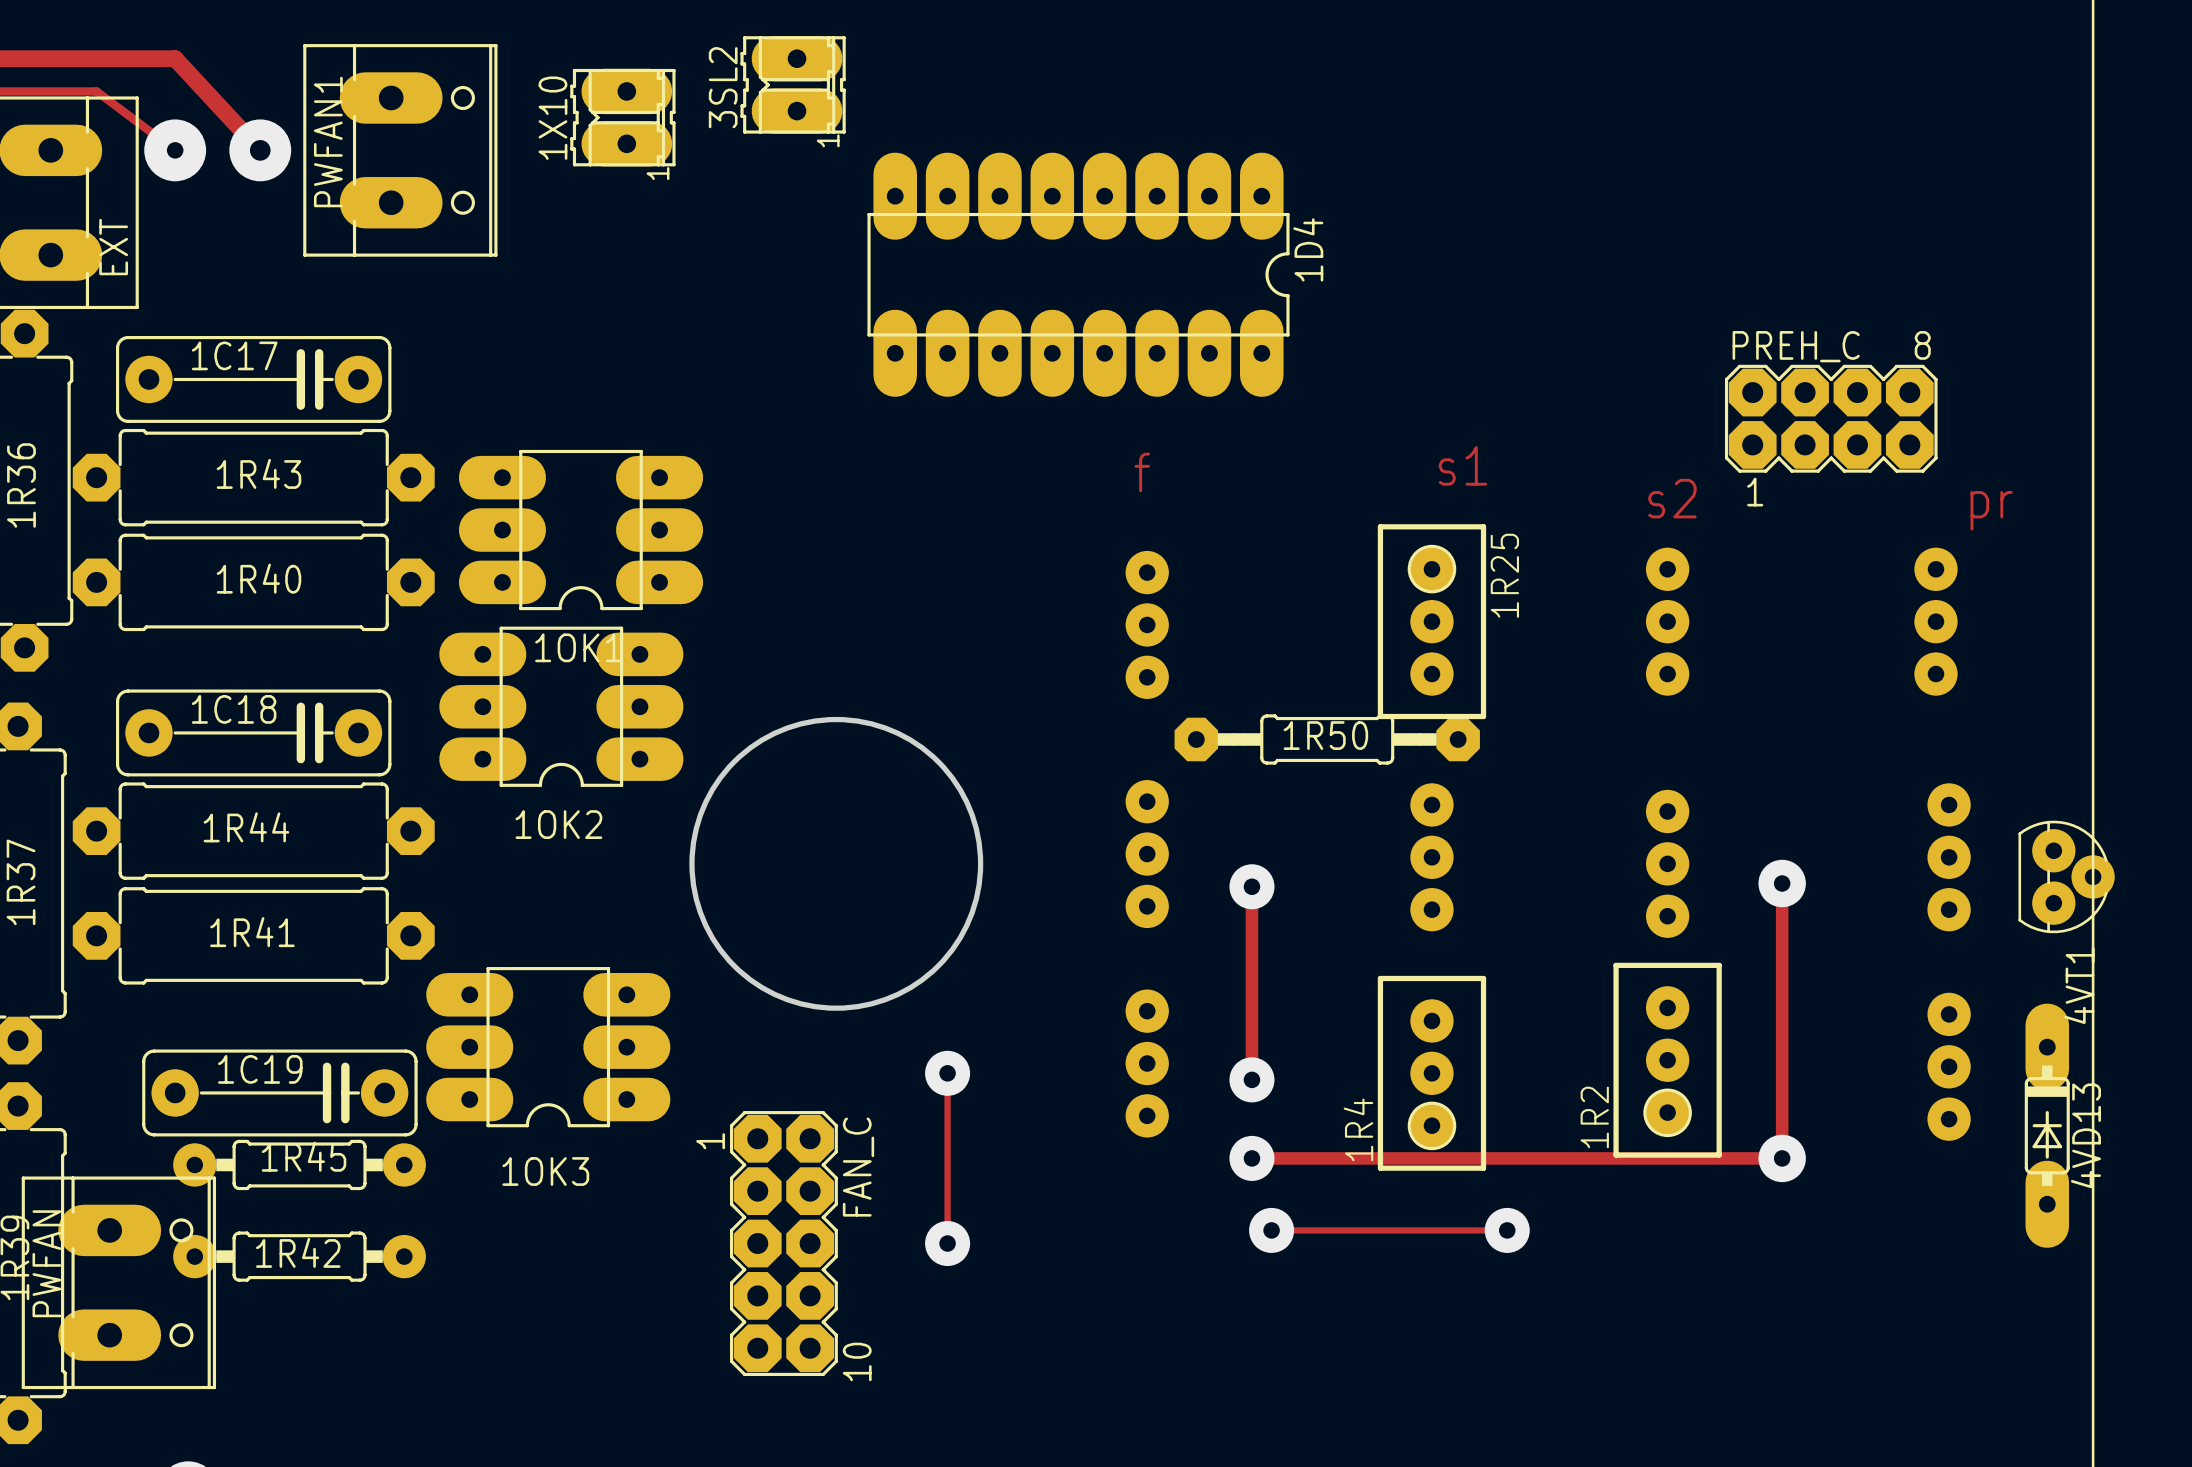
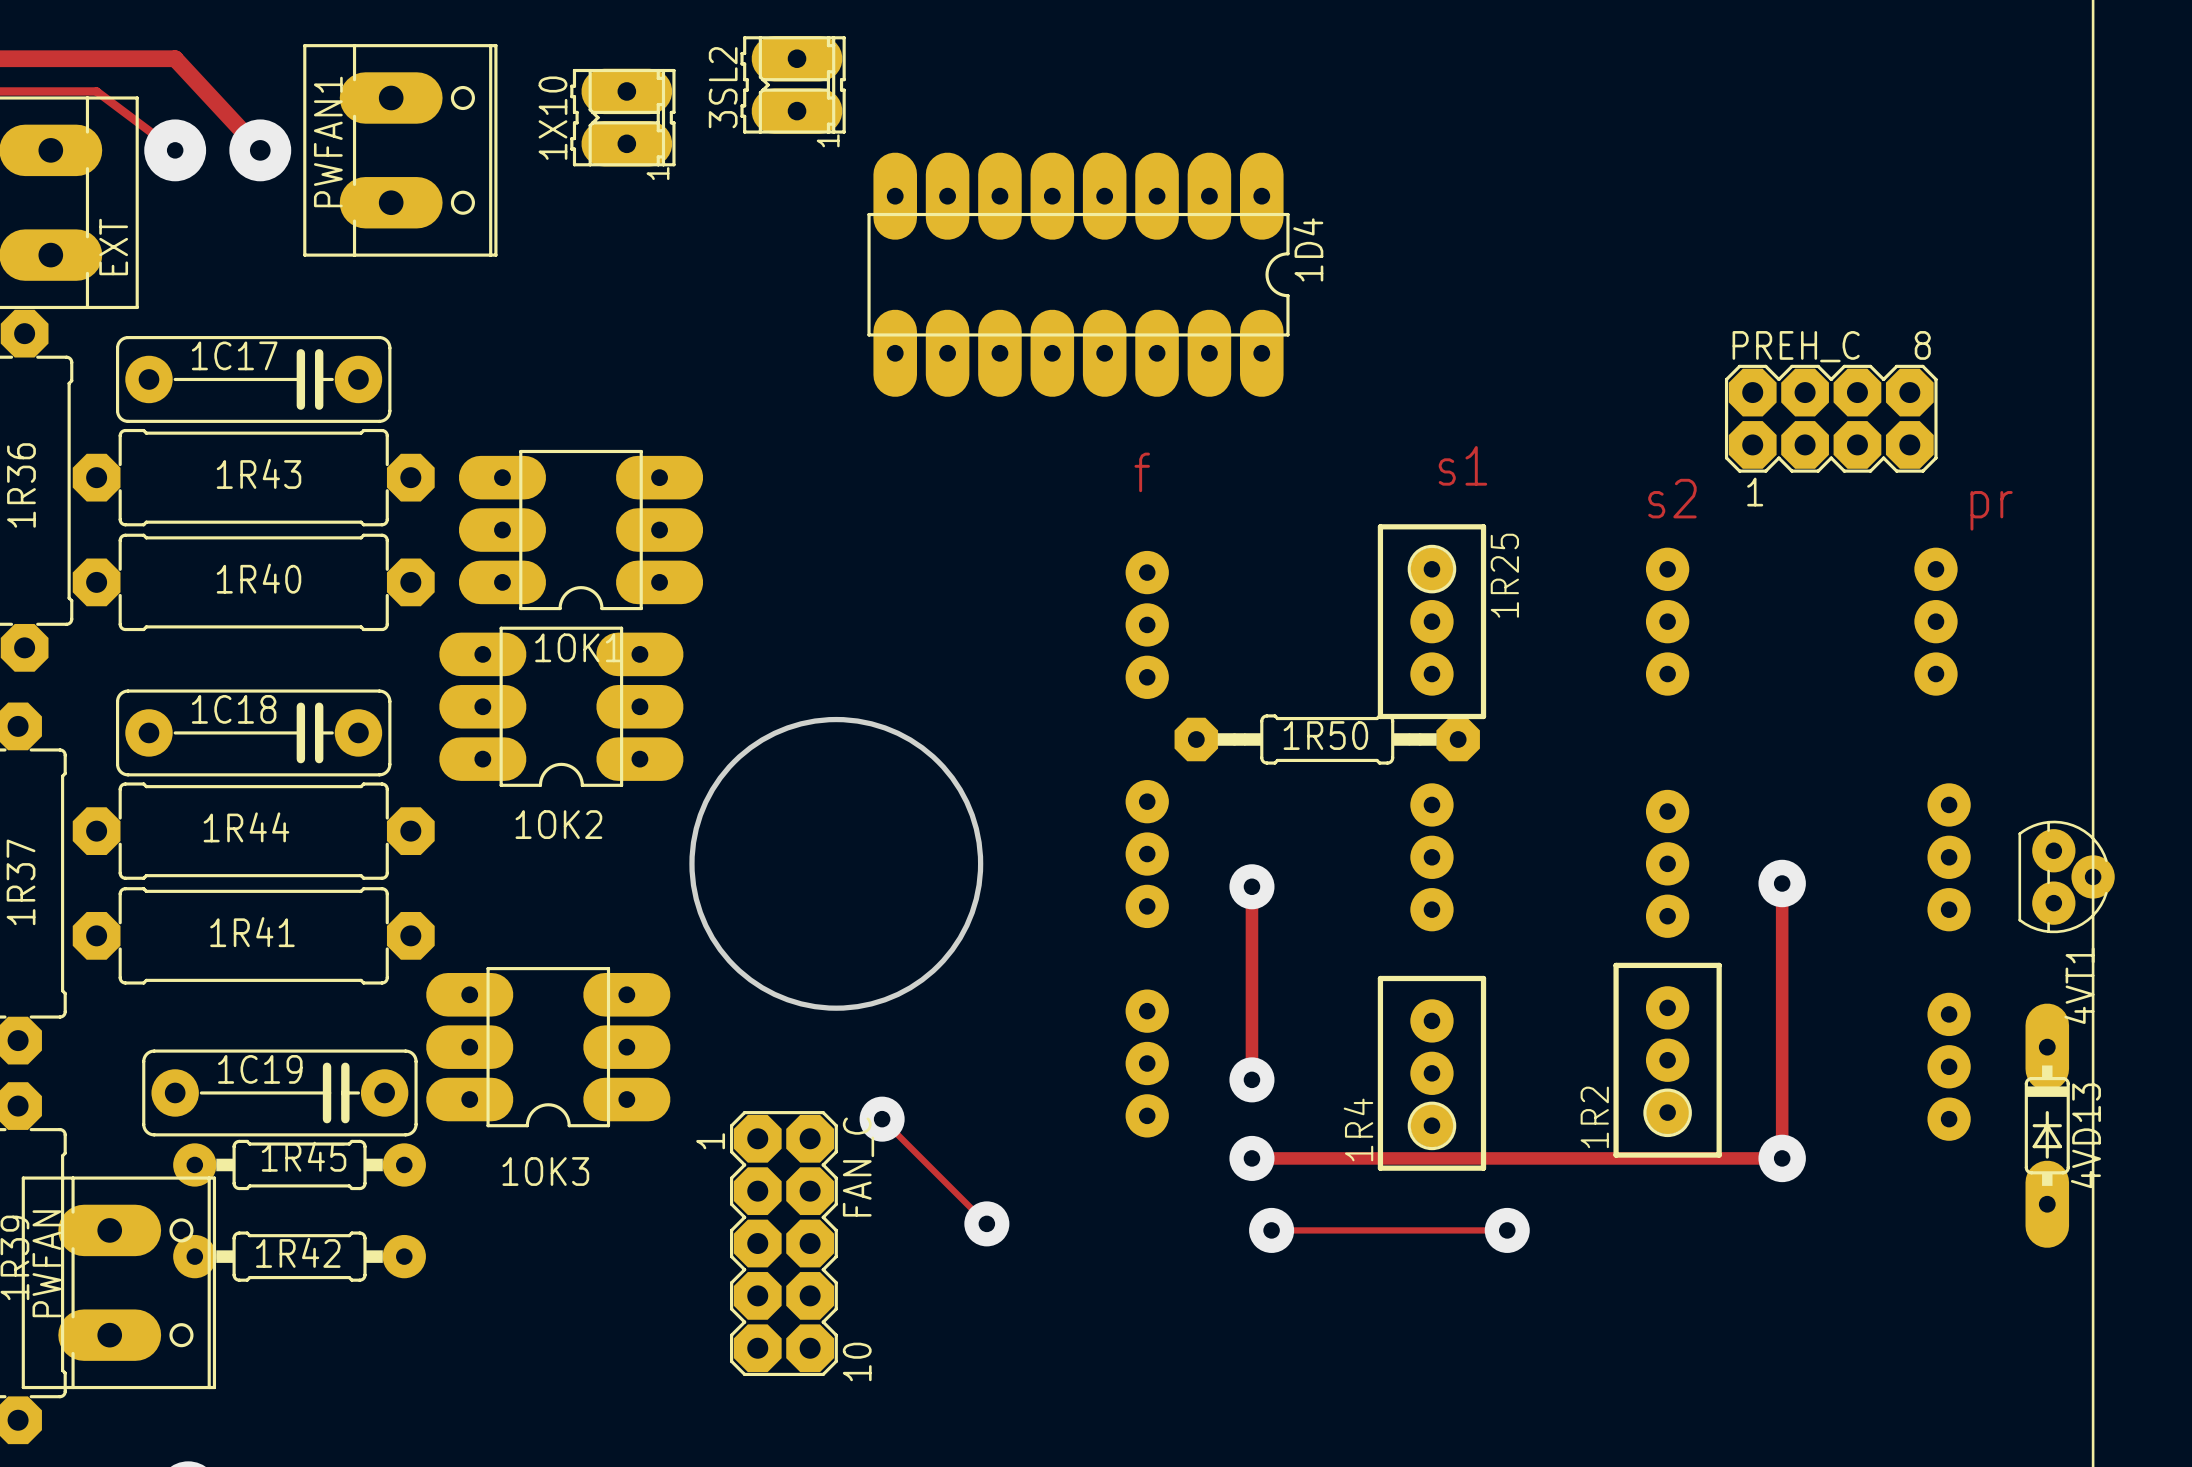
track: (947, 1073) (947, 1243) -> none
via: (947, 1073) -> none
track: none -> (882, 1119) (986, 1223)
via: none -> (882, 1119)
via position: (947, 1243) -> (986, 1223)

